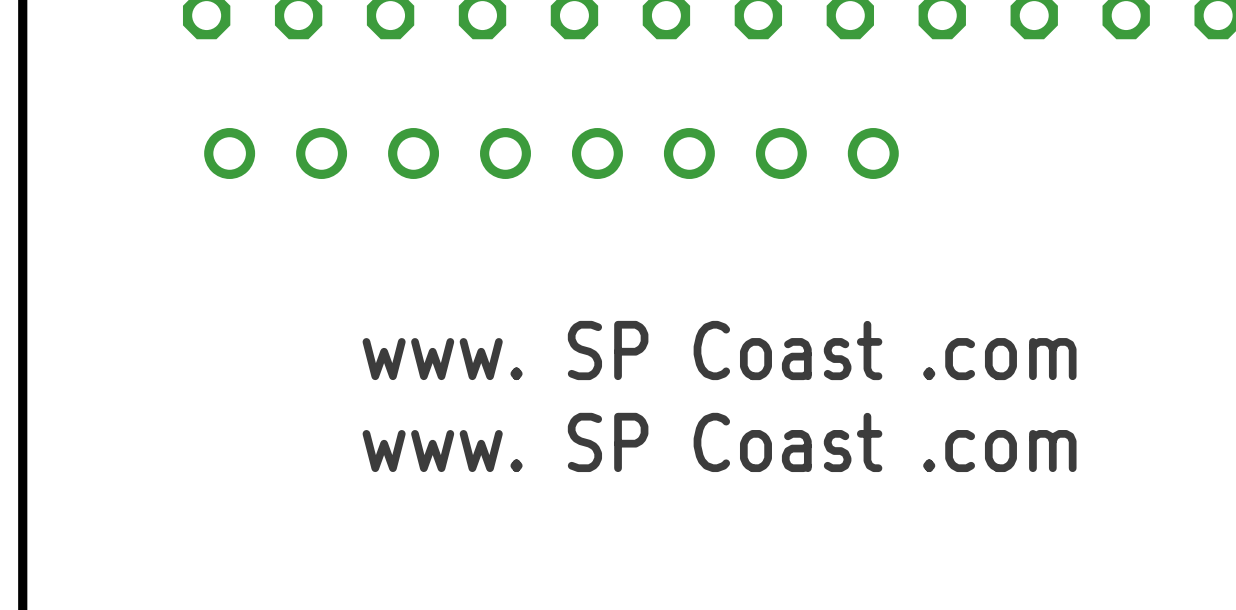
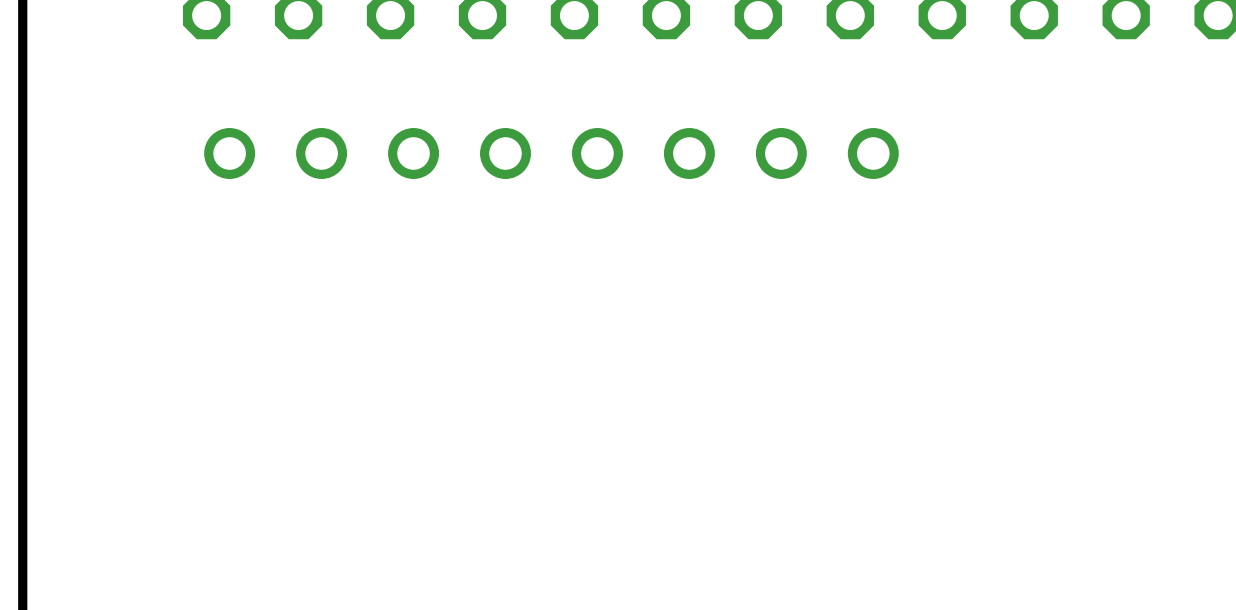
text: www. SP Coast .com (719, 350) -> none
text: www. SP Coast .com (719, 442) -> none

